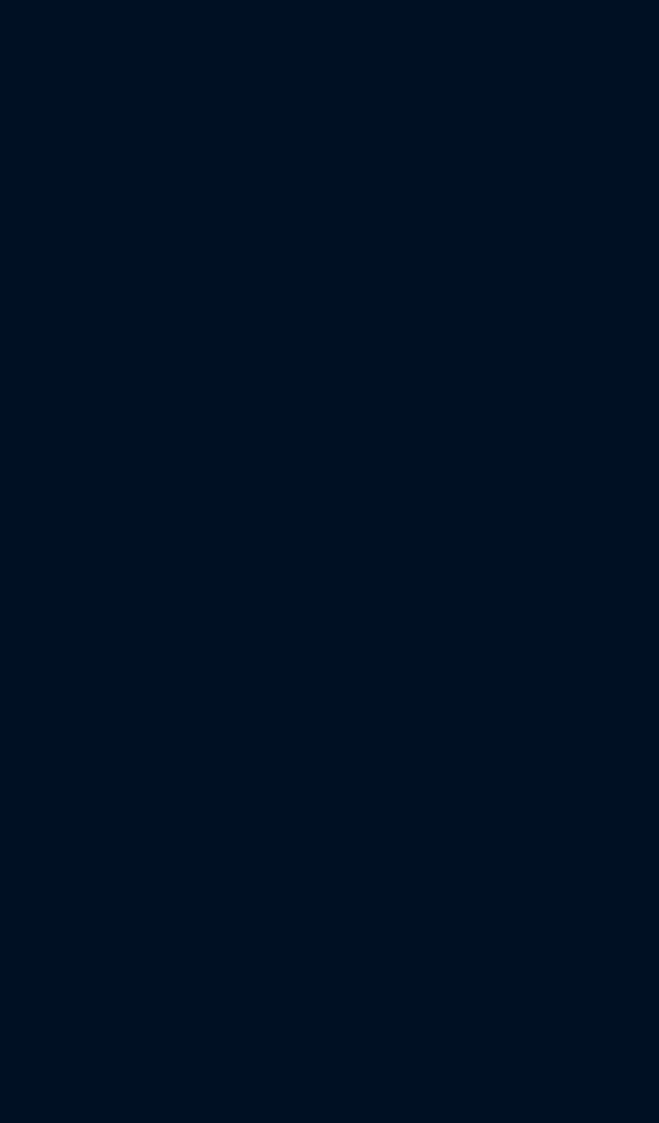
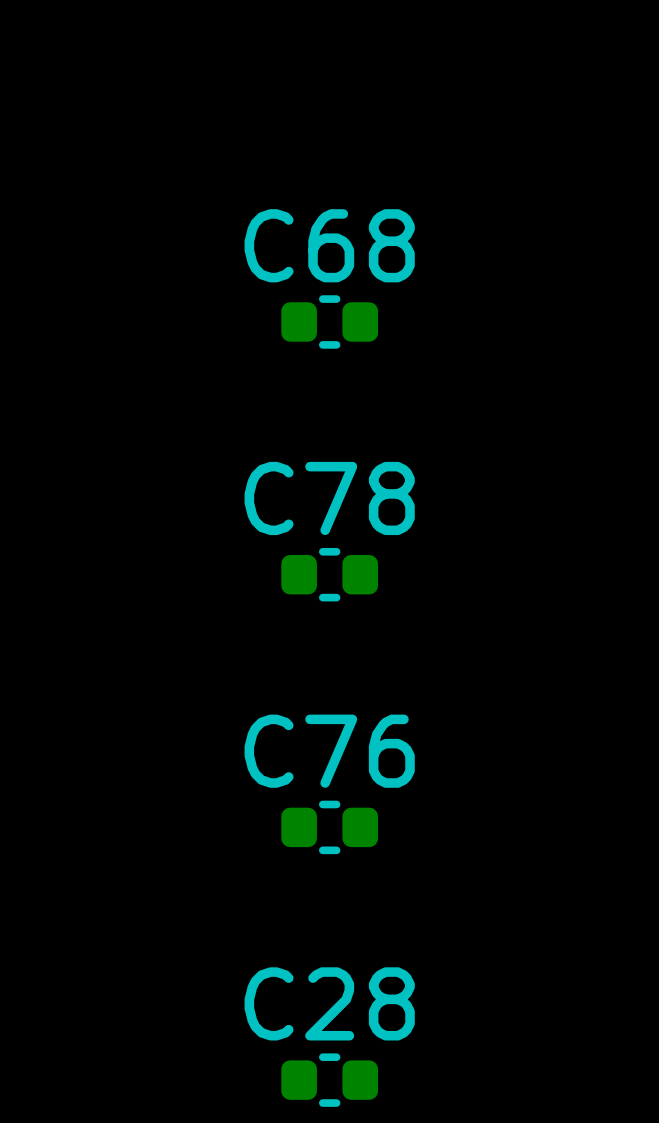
C68: none -> (329, 321)
C78: none -> (329, 574)
C76: none -> (329, 827)
C28: none -> (329, 1080)

